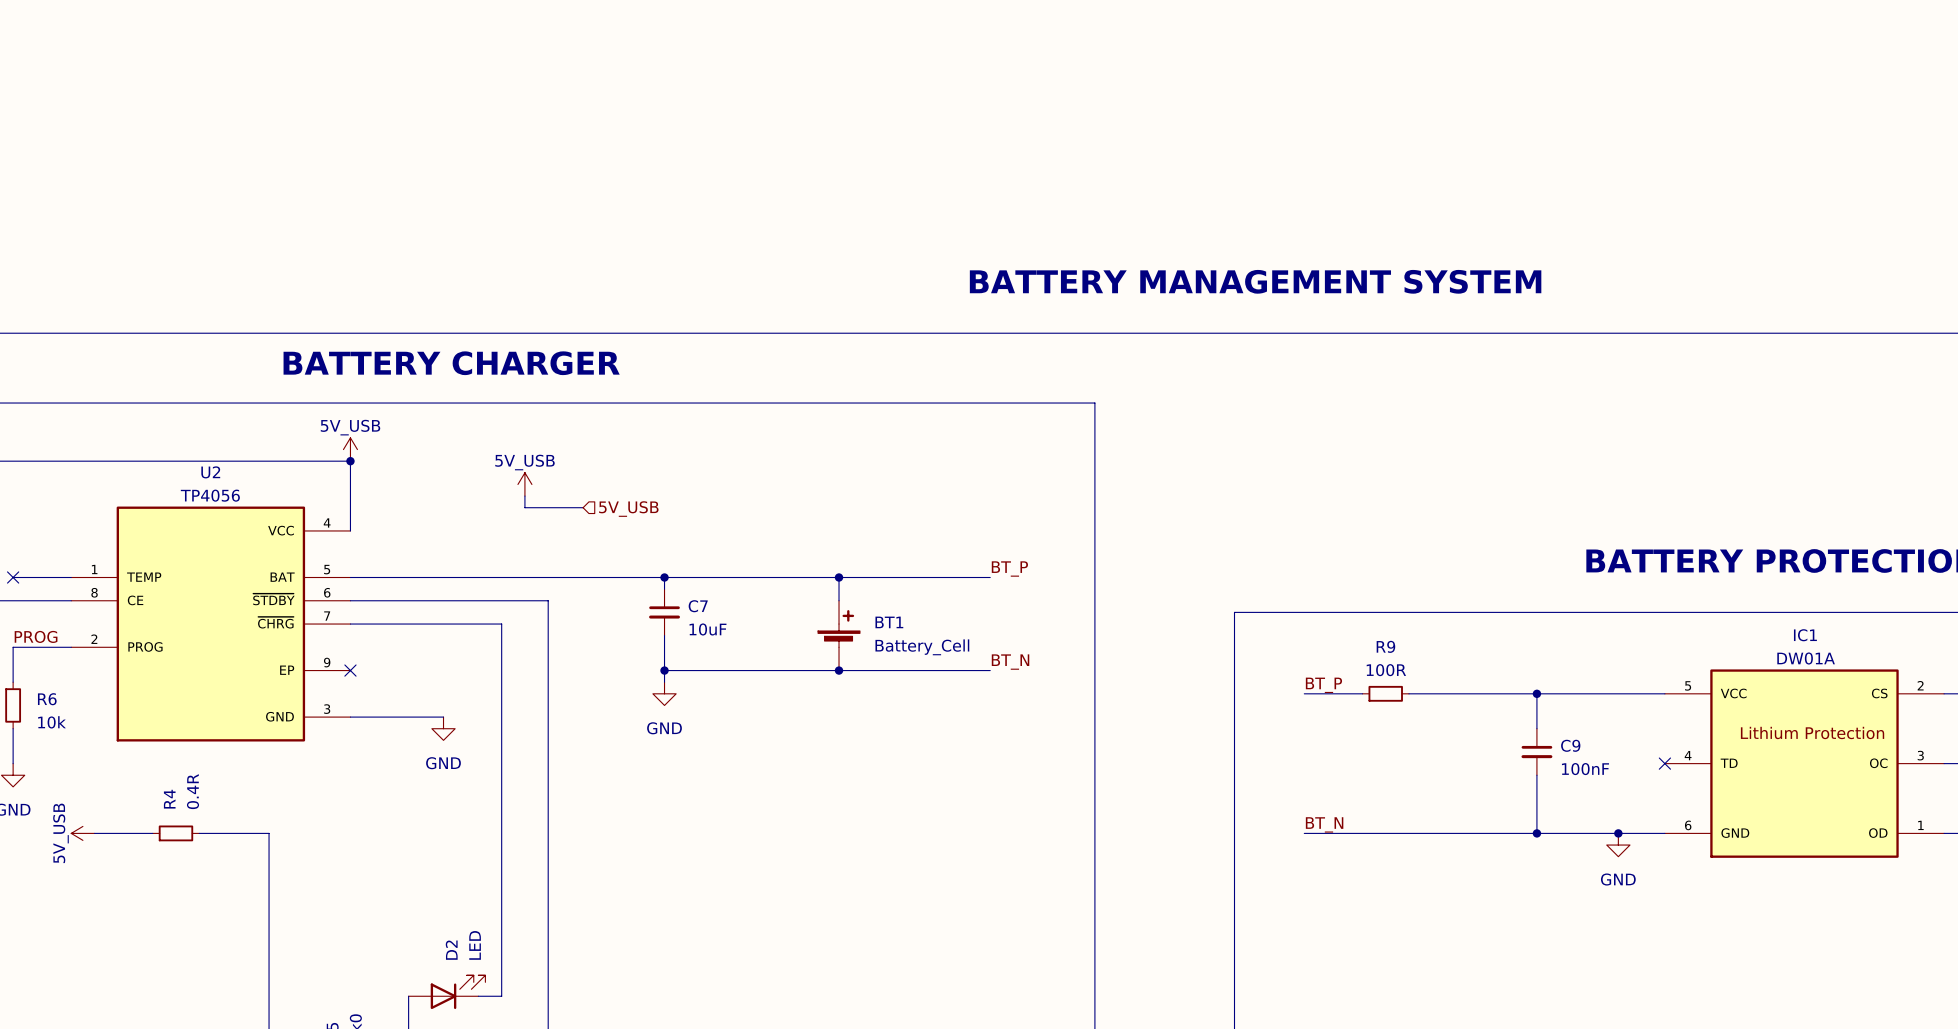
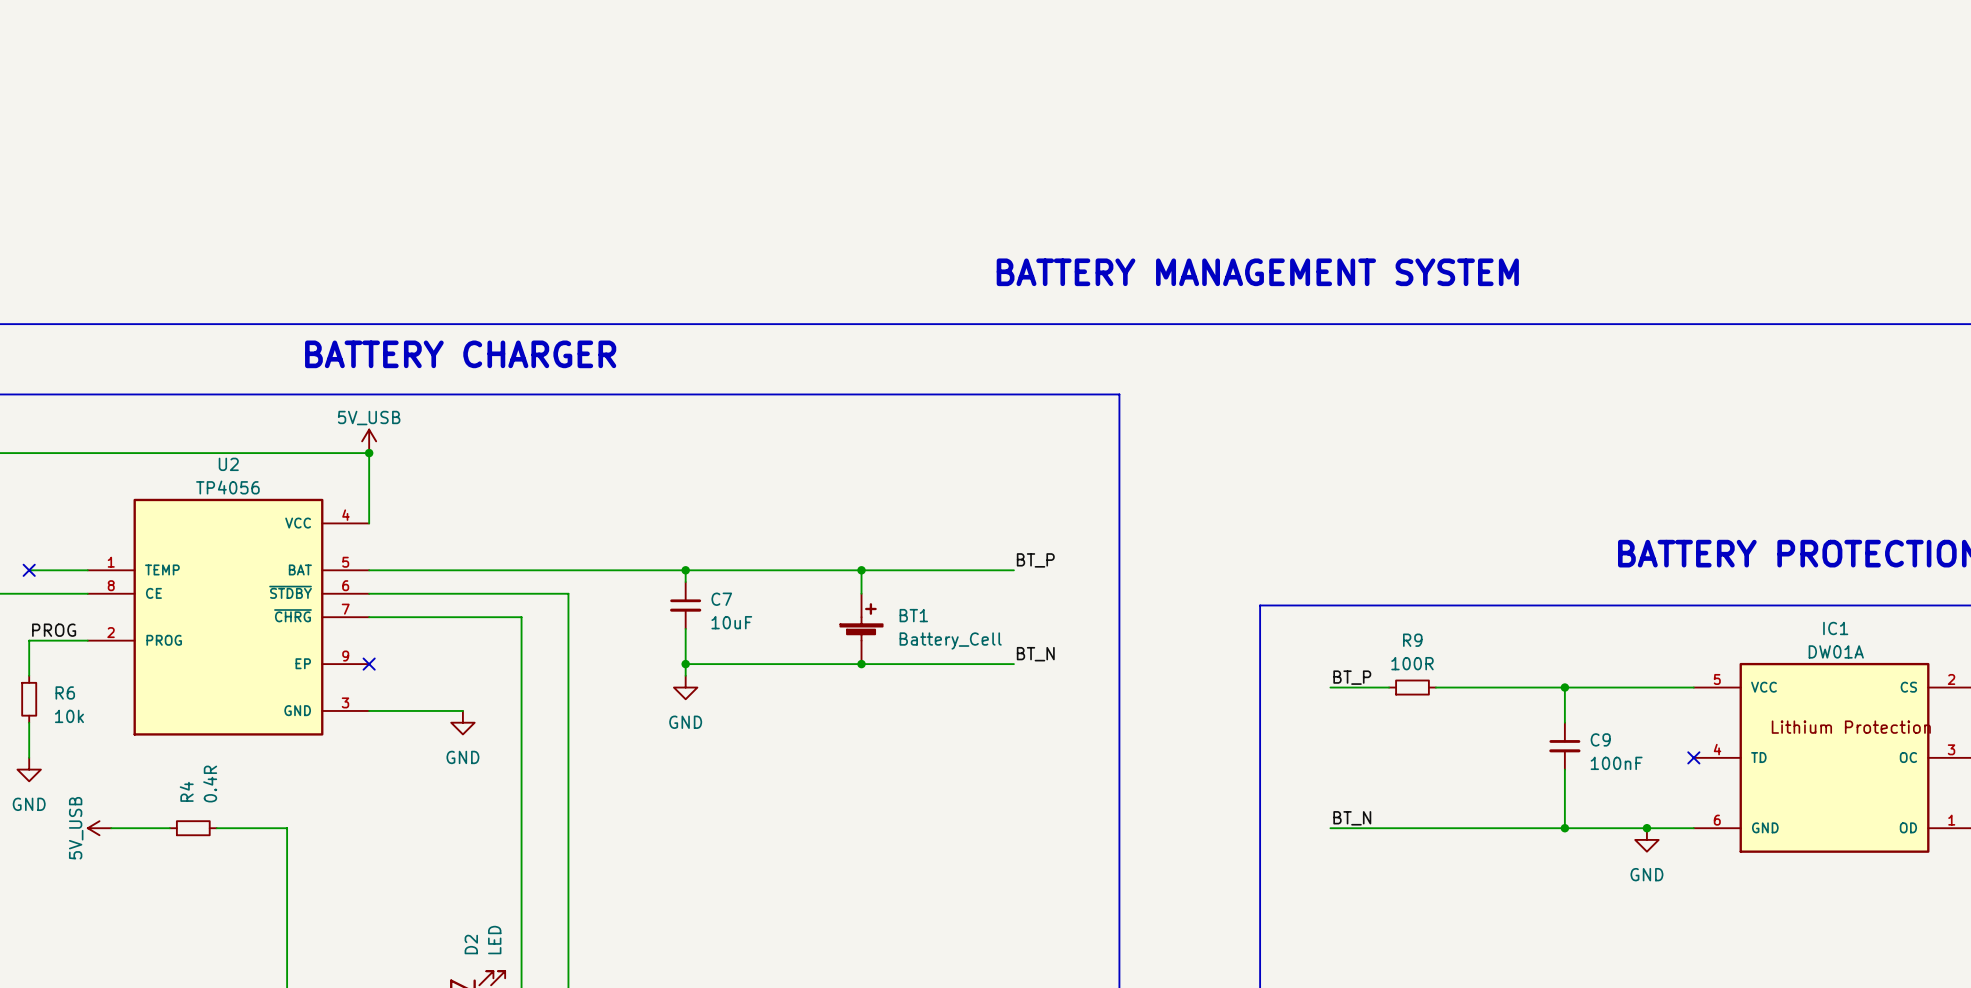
power symbol: 5V_USB (524, 484) -> none
wire: (524, 496) (524, 507) (583, 507) -> none
hierarchical label: 5V_USB (628, 509) -> none

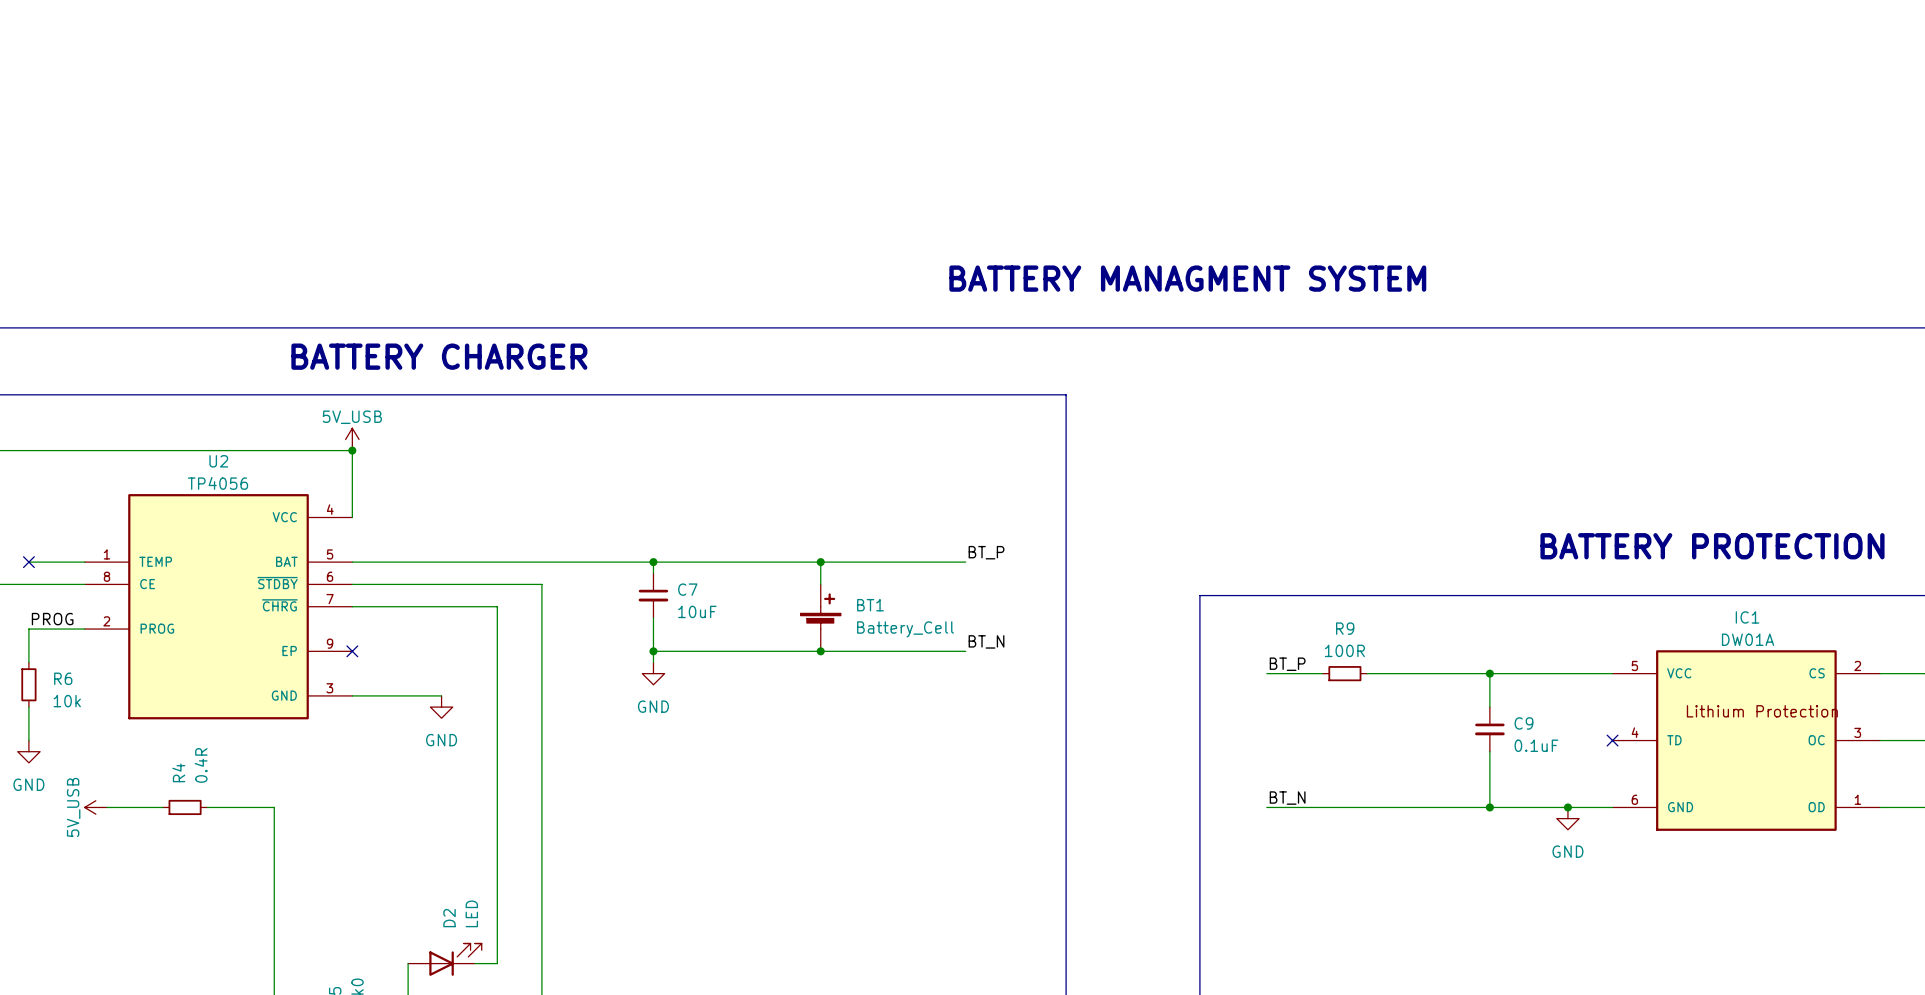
text: BATTERY MANAGEMENT SYSTEM (1257, 272) -> BATTERY MANAGMENT SYSTEM (1187, 278)
C9 value: 100nF (1616, 763) -> 0.1uF (1536, 745)

